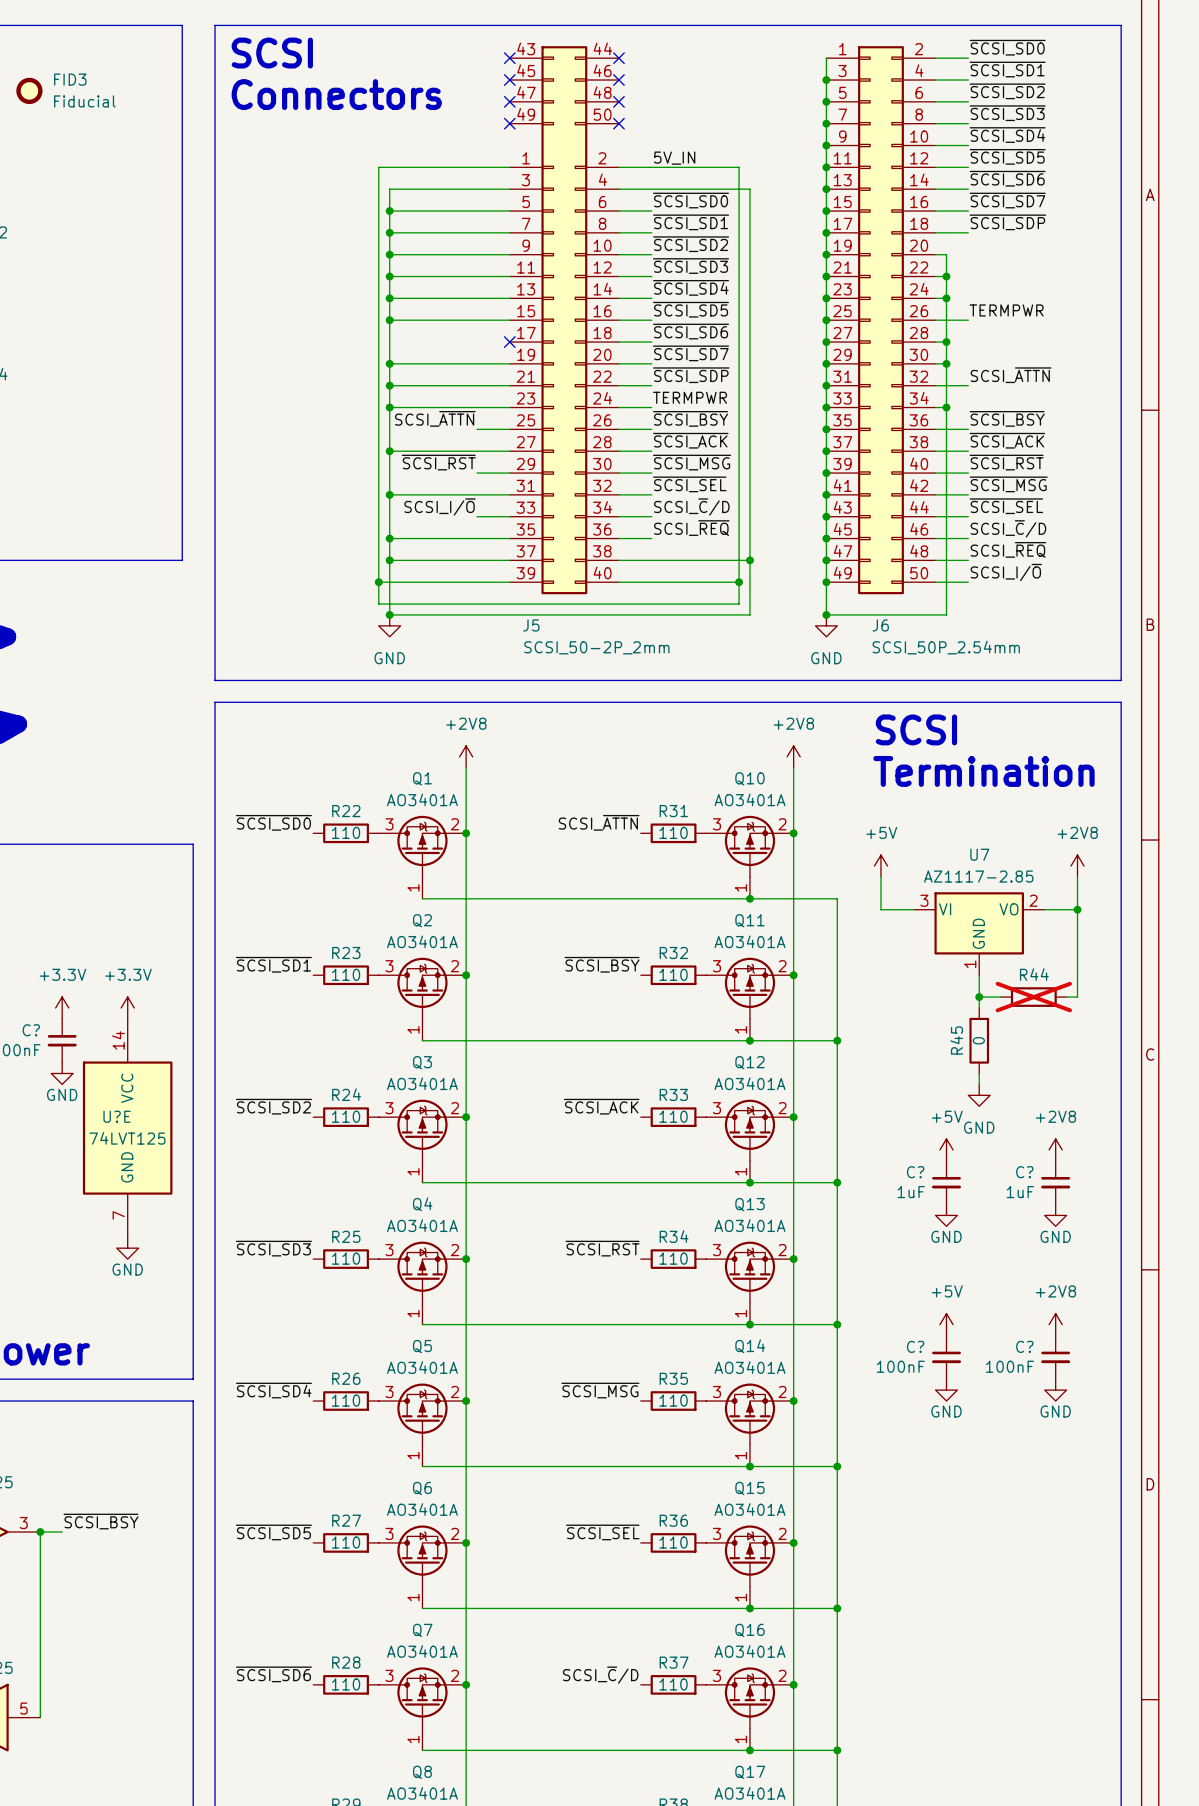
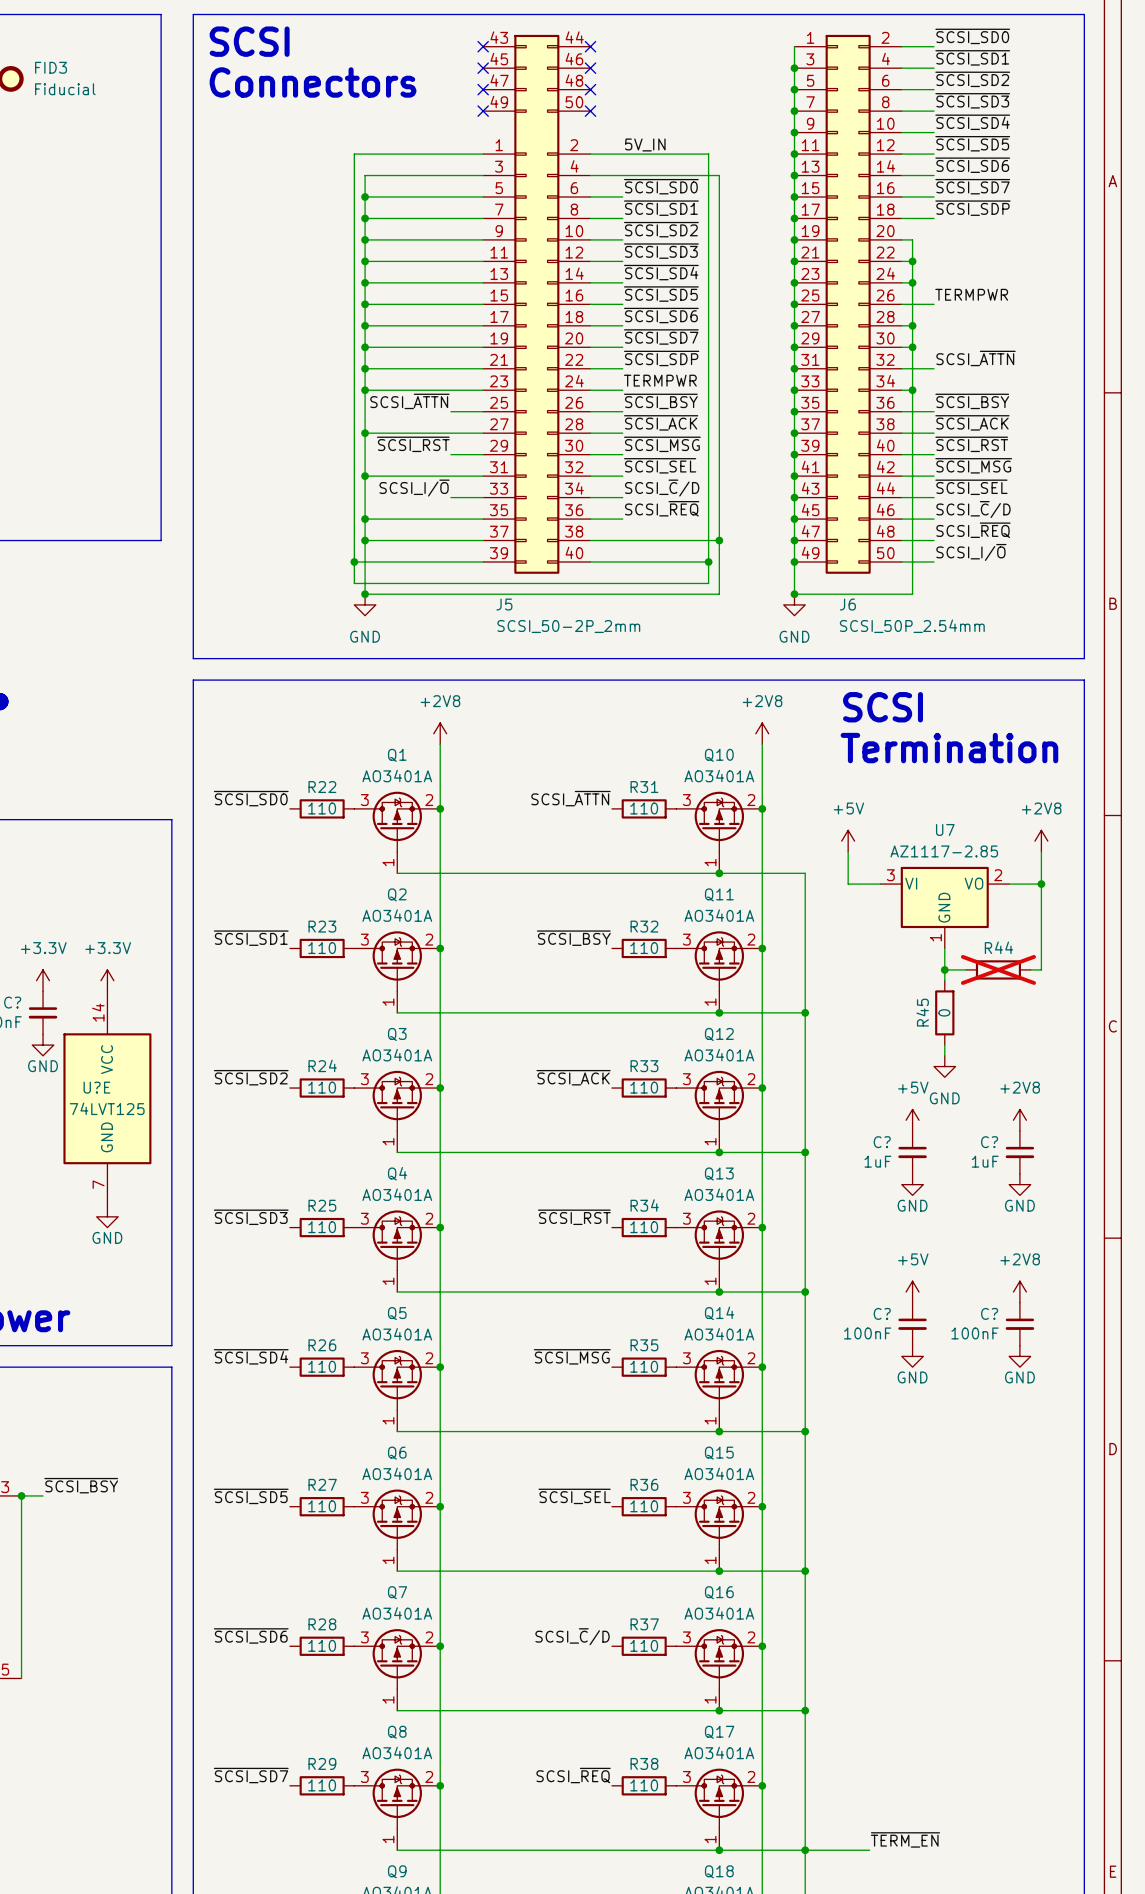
wire: none -> (365, 325) (483, 325)
junction: none -> (365, 325)
no-connect mark: (509, 342) -> none

